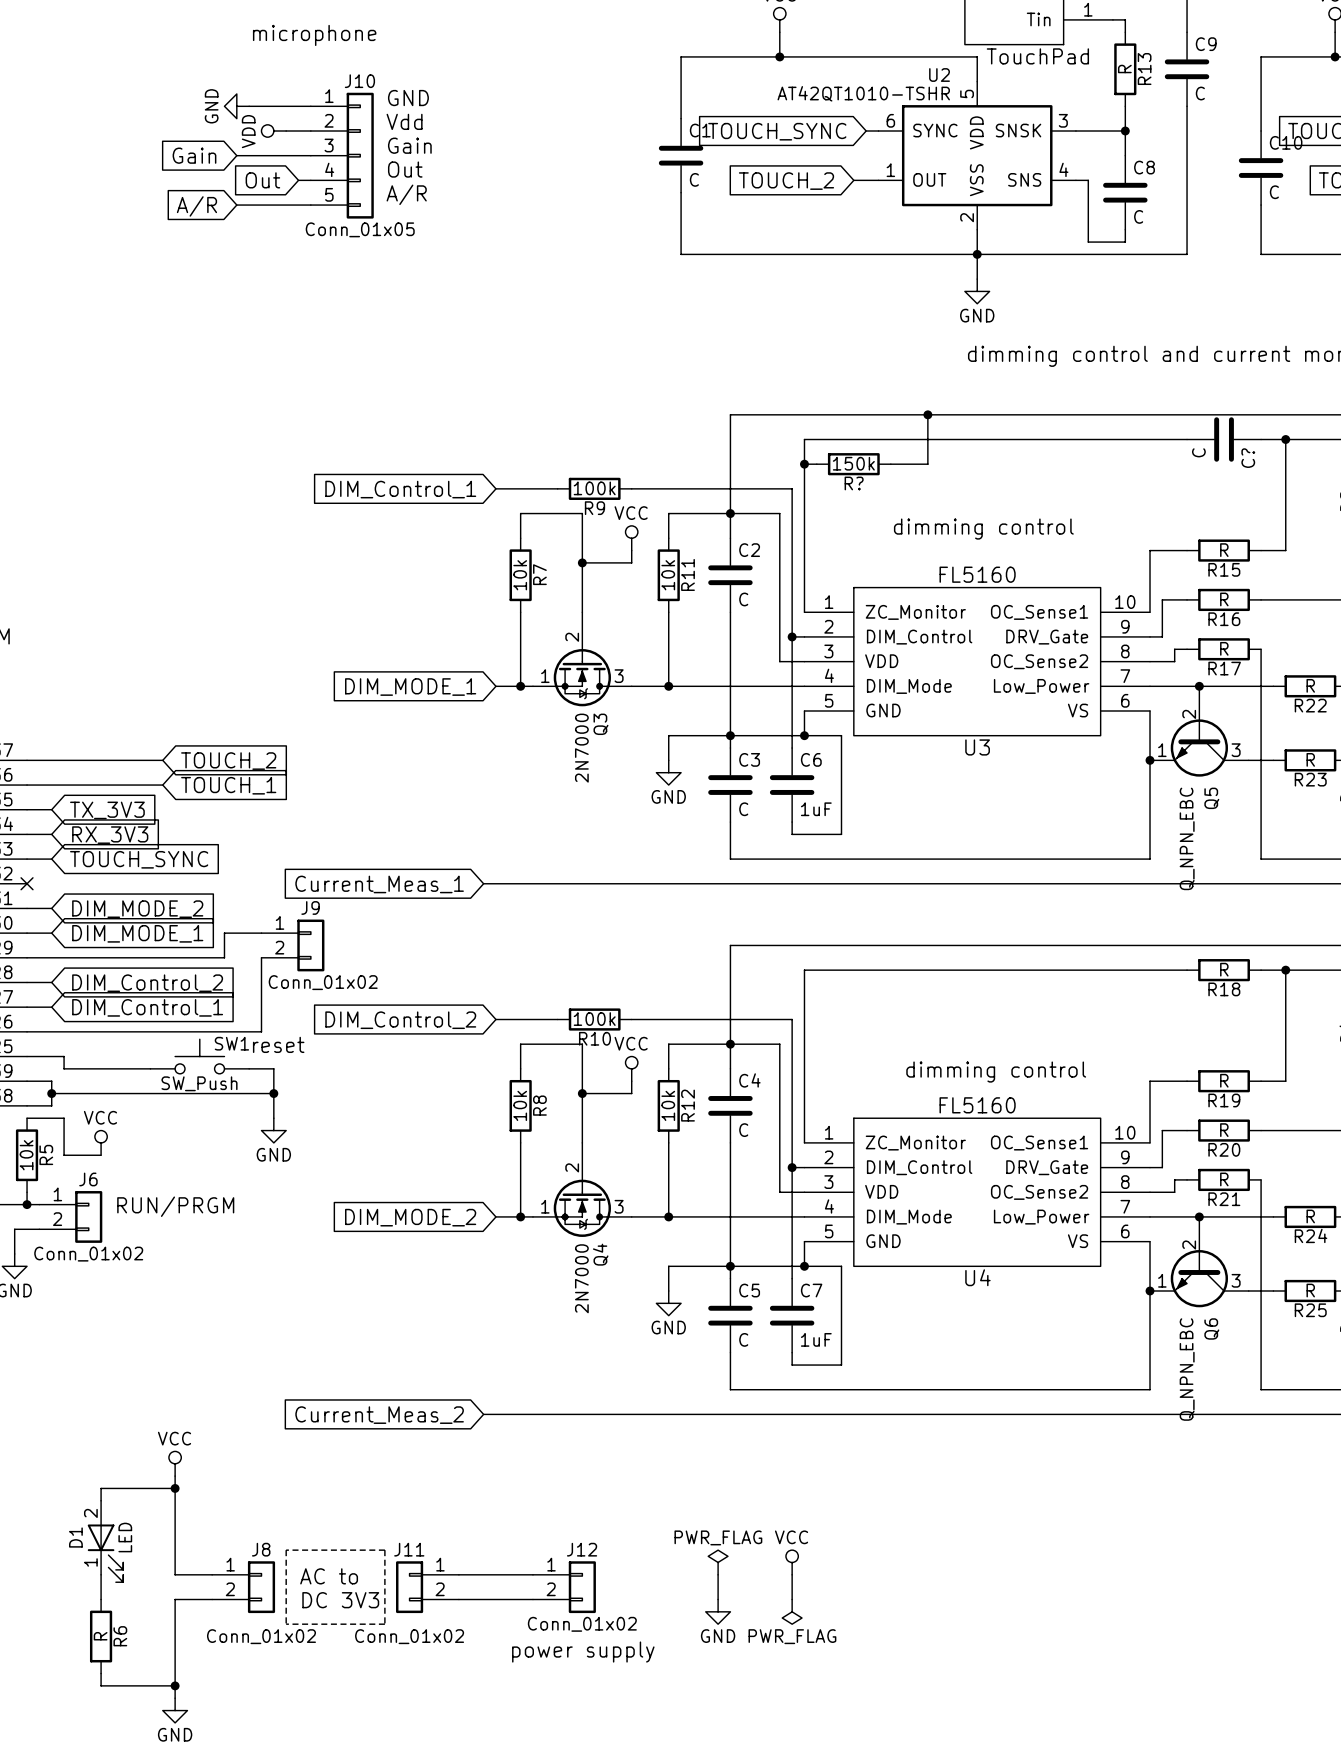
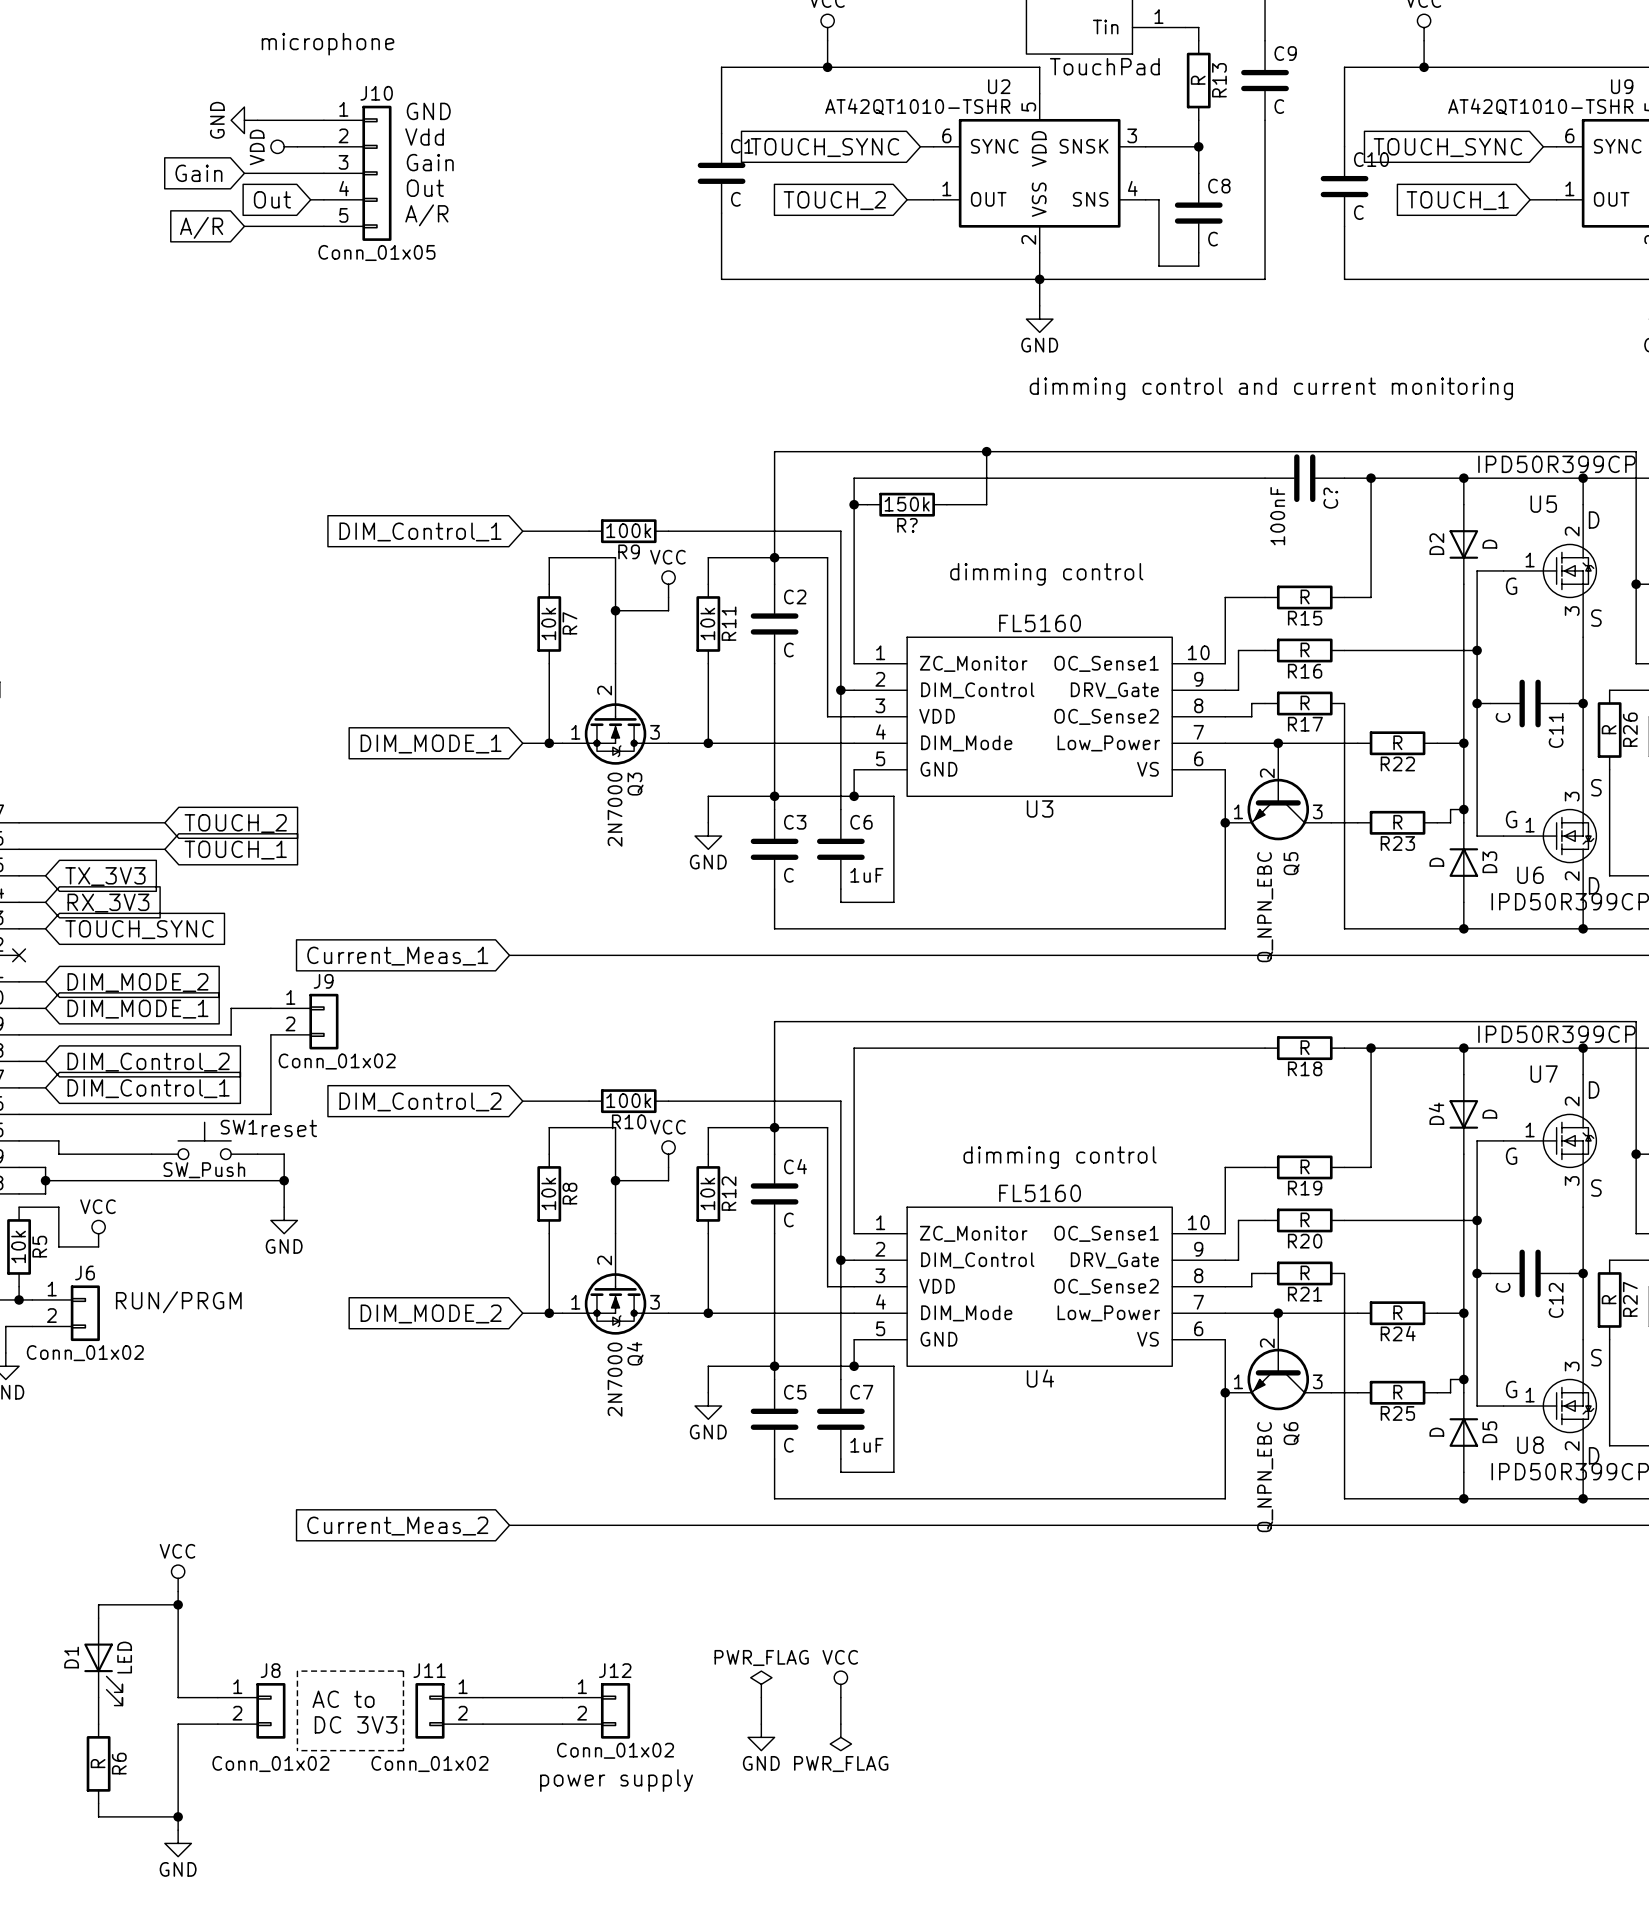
C? value: C (1198, 452) -> 100nF (1277, 516)
D1 pin number: 2 (90, 1513) -> none
D1 pin number: 1 (90, 1562) -> none

